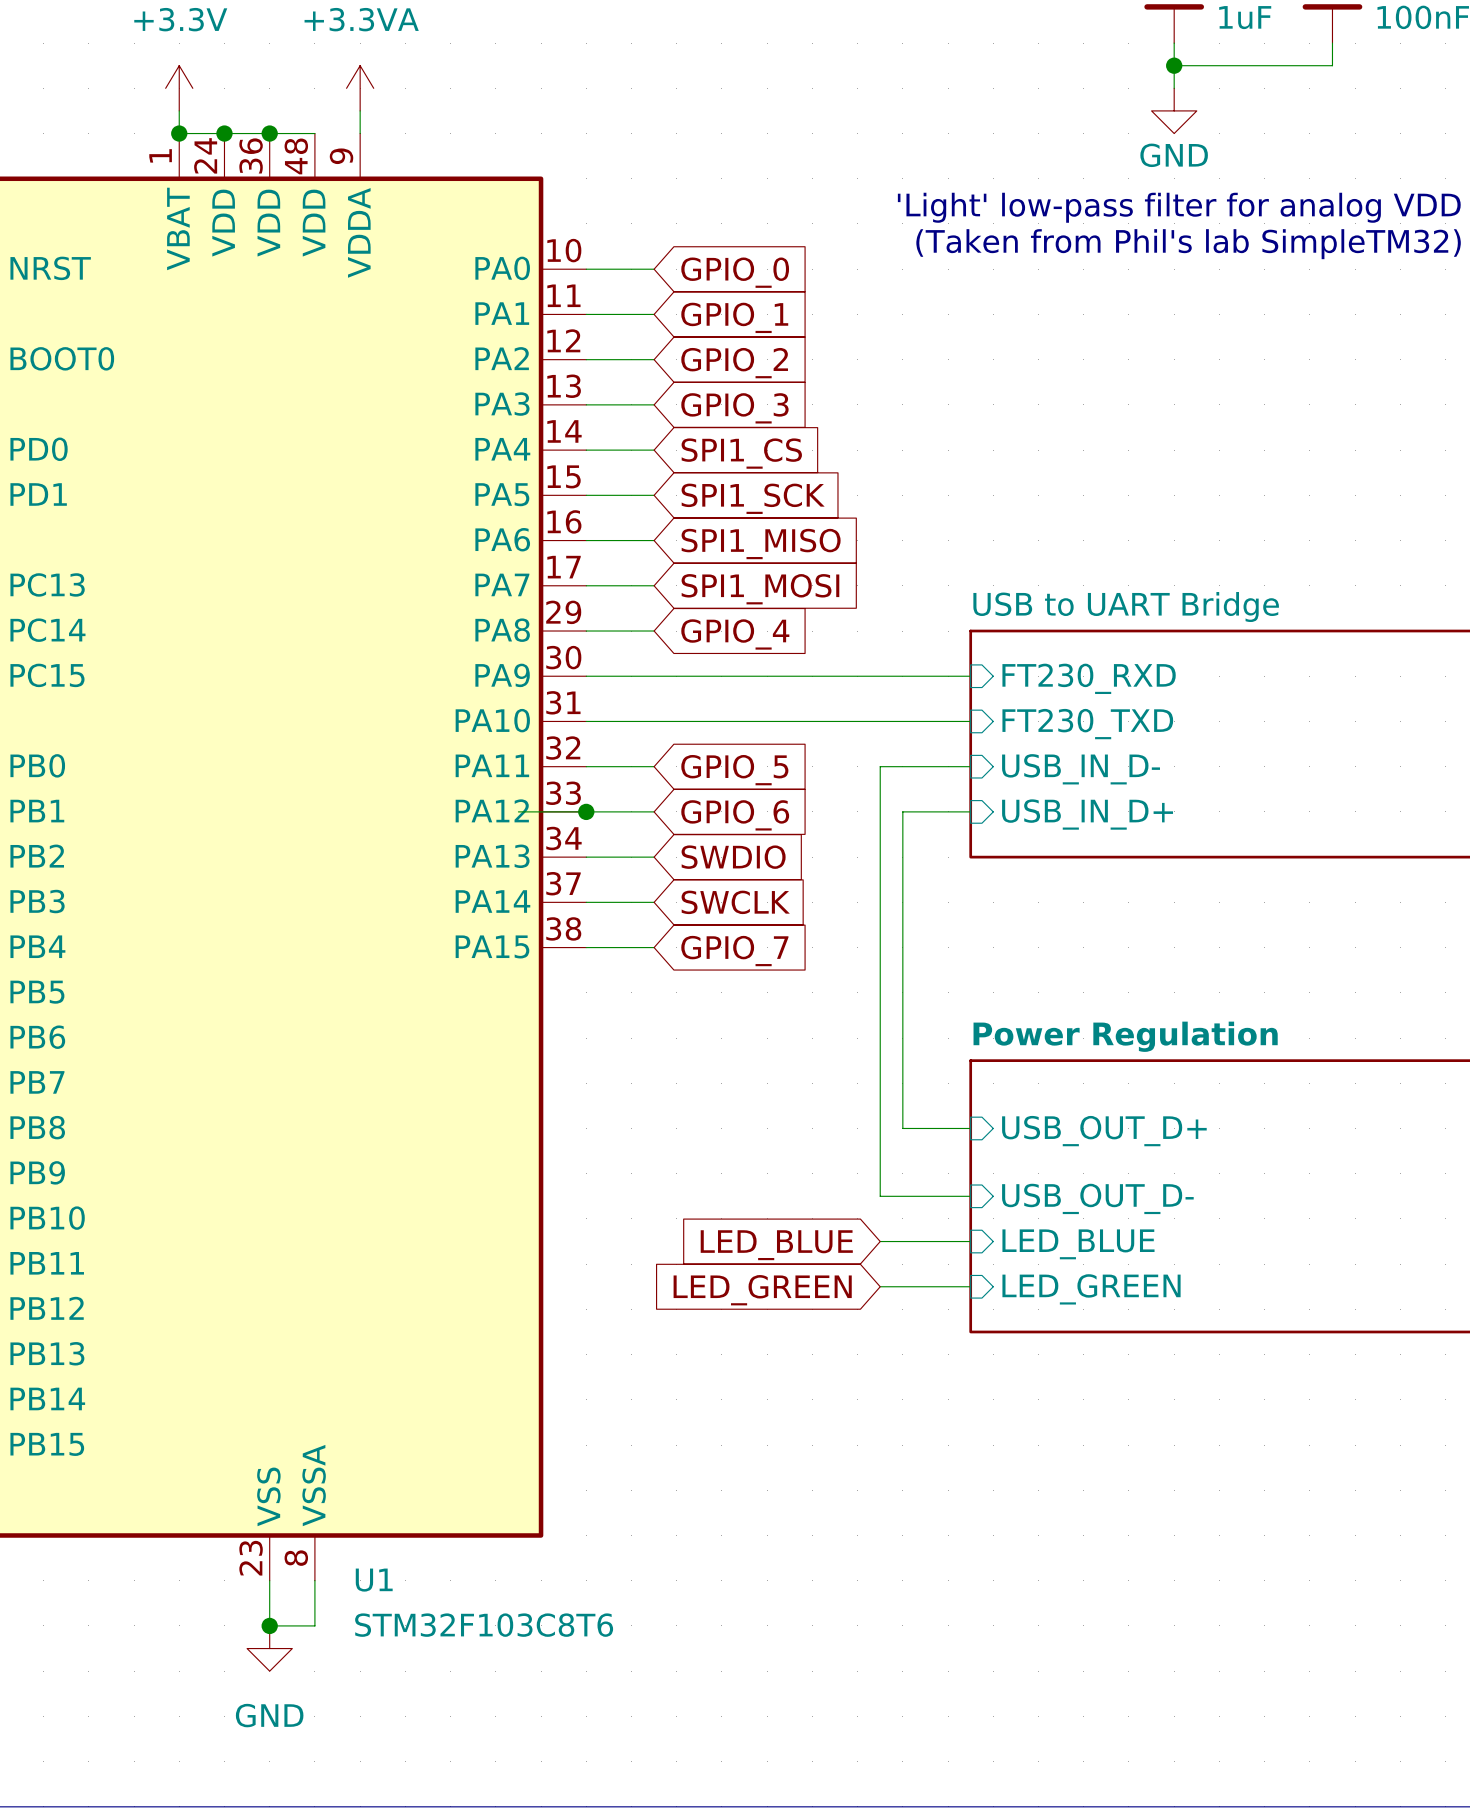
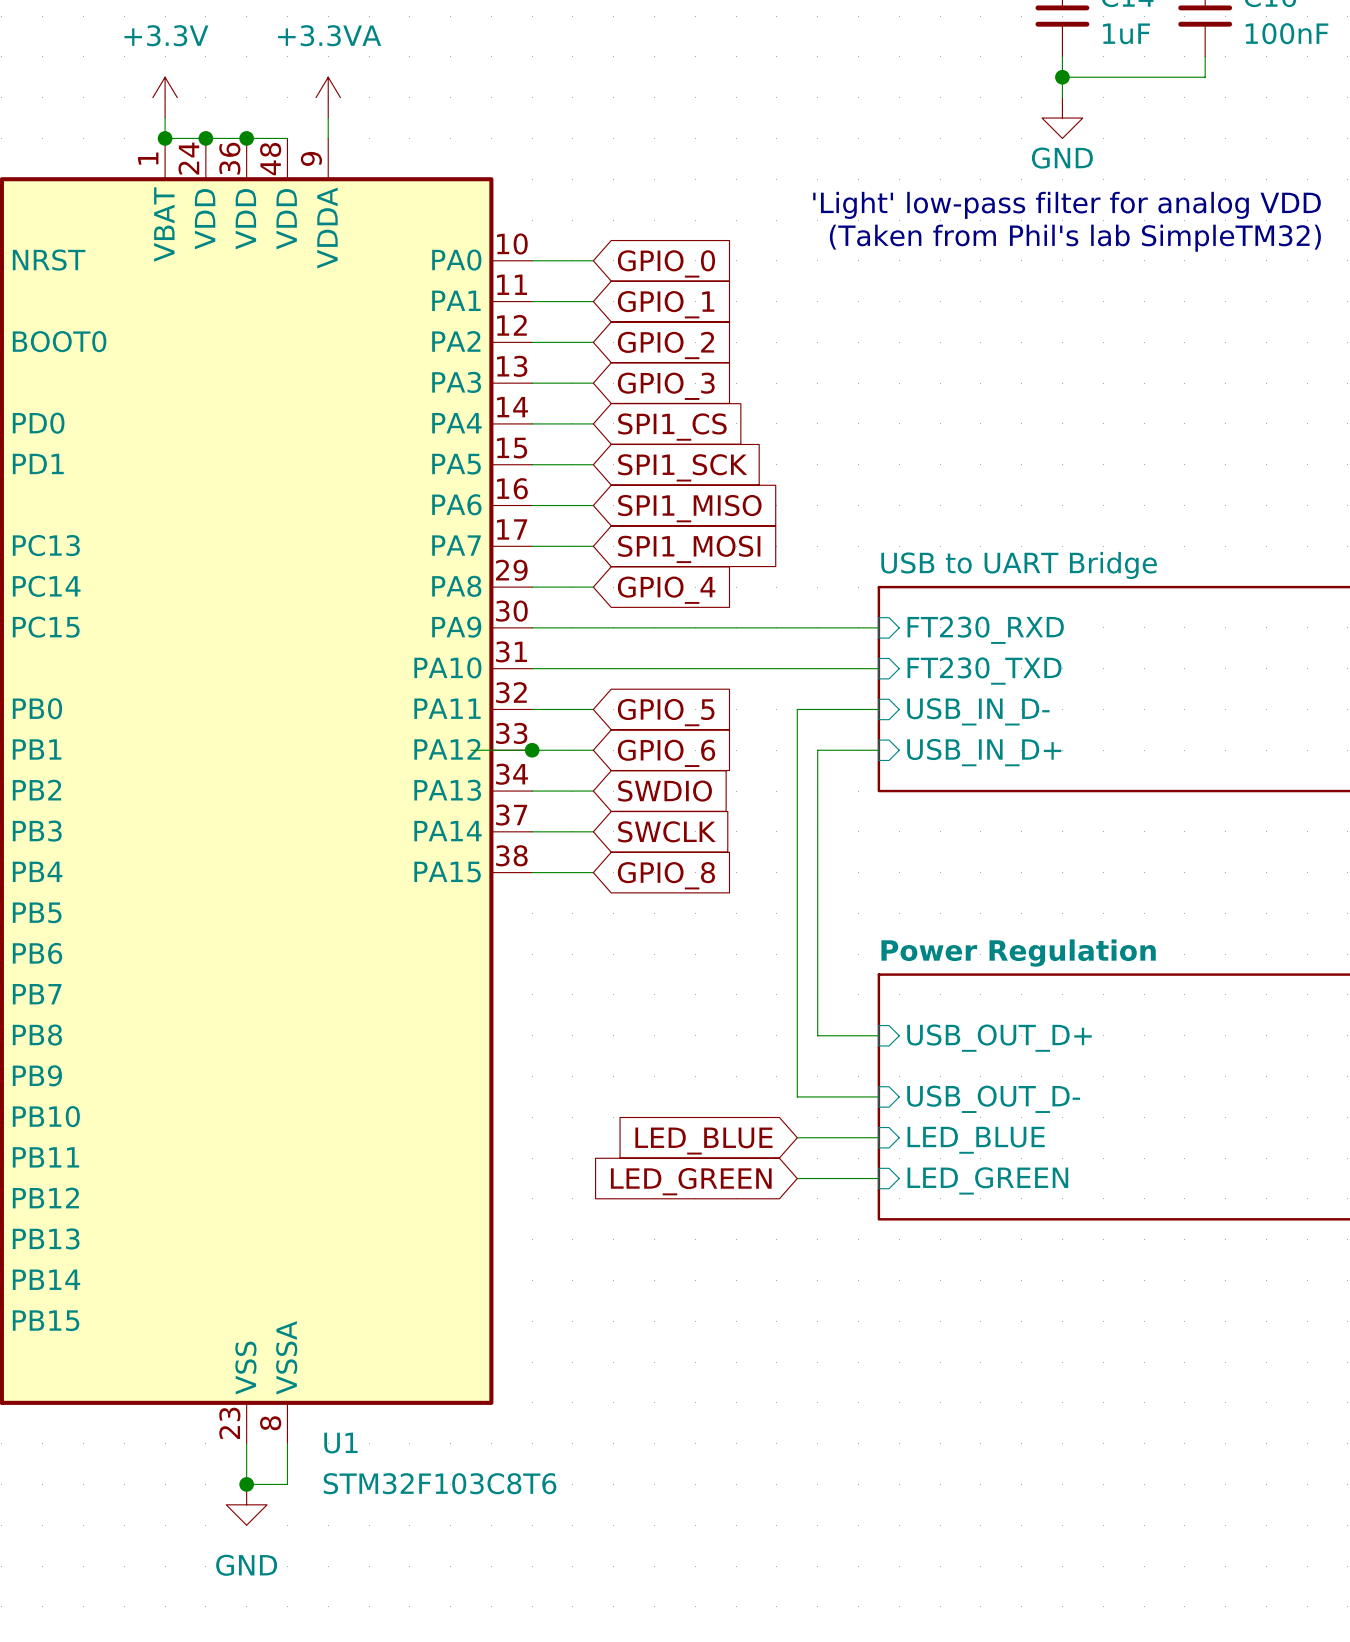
global label: GPIO_7 (734, 951) -> GPIO_8 (666, 875)

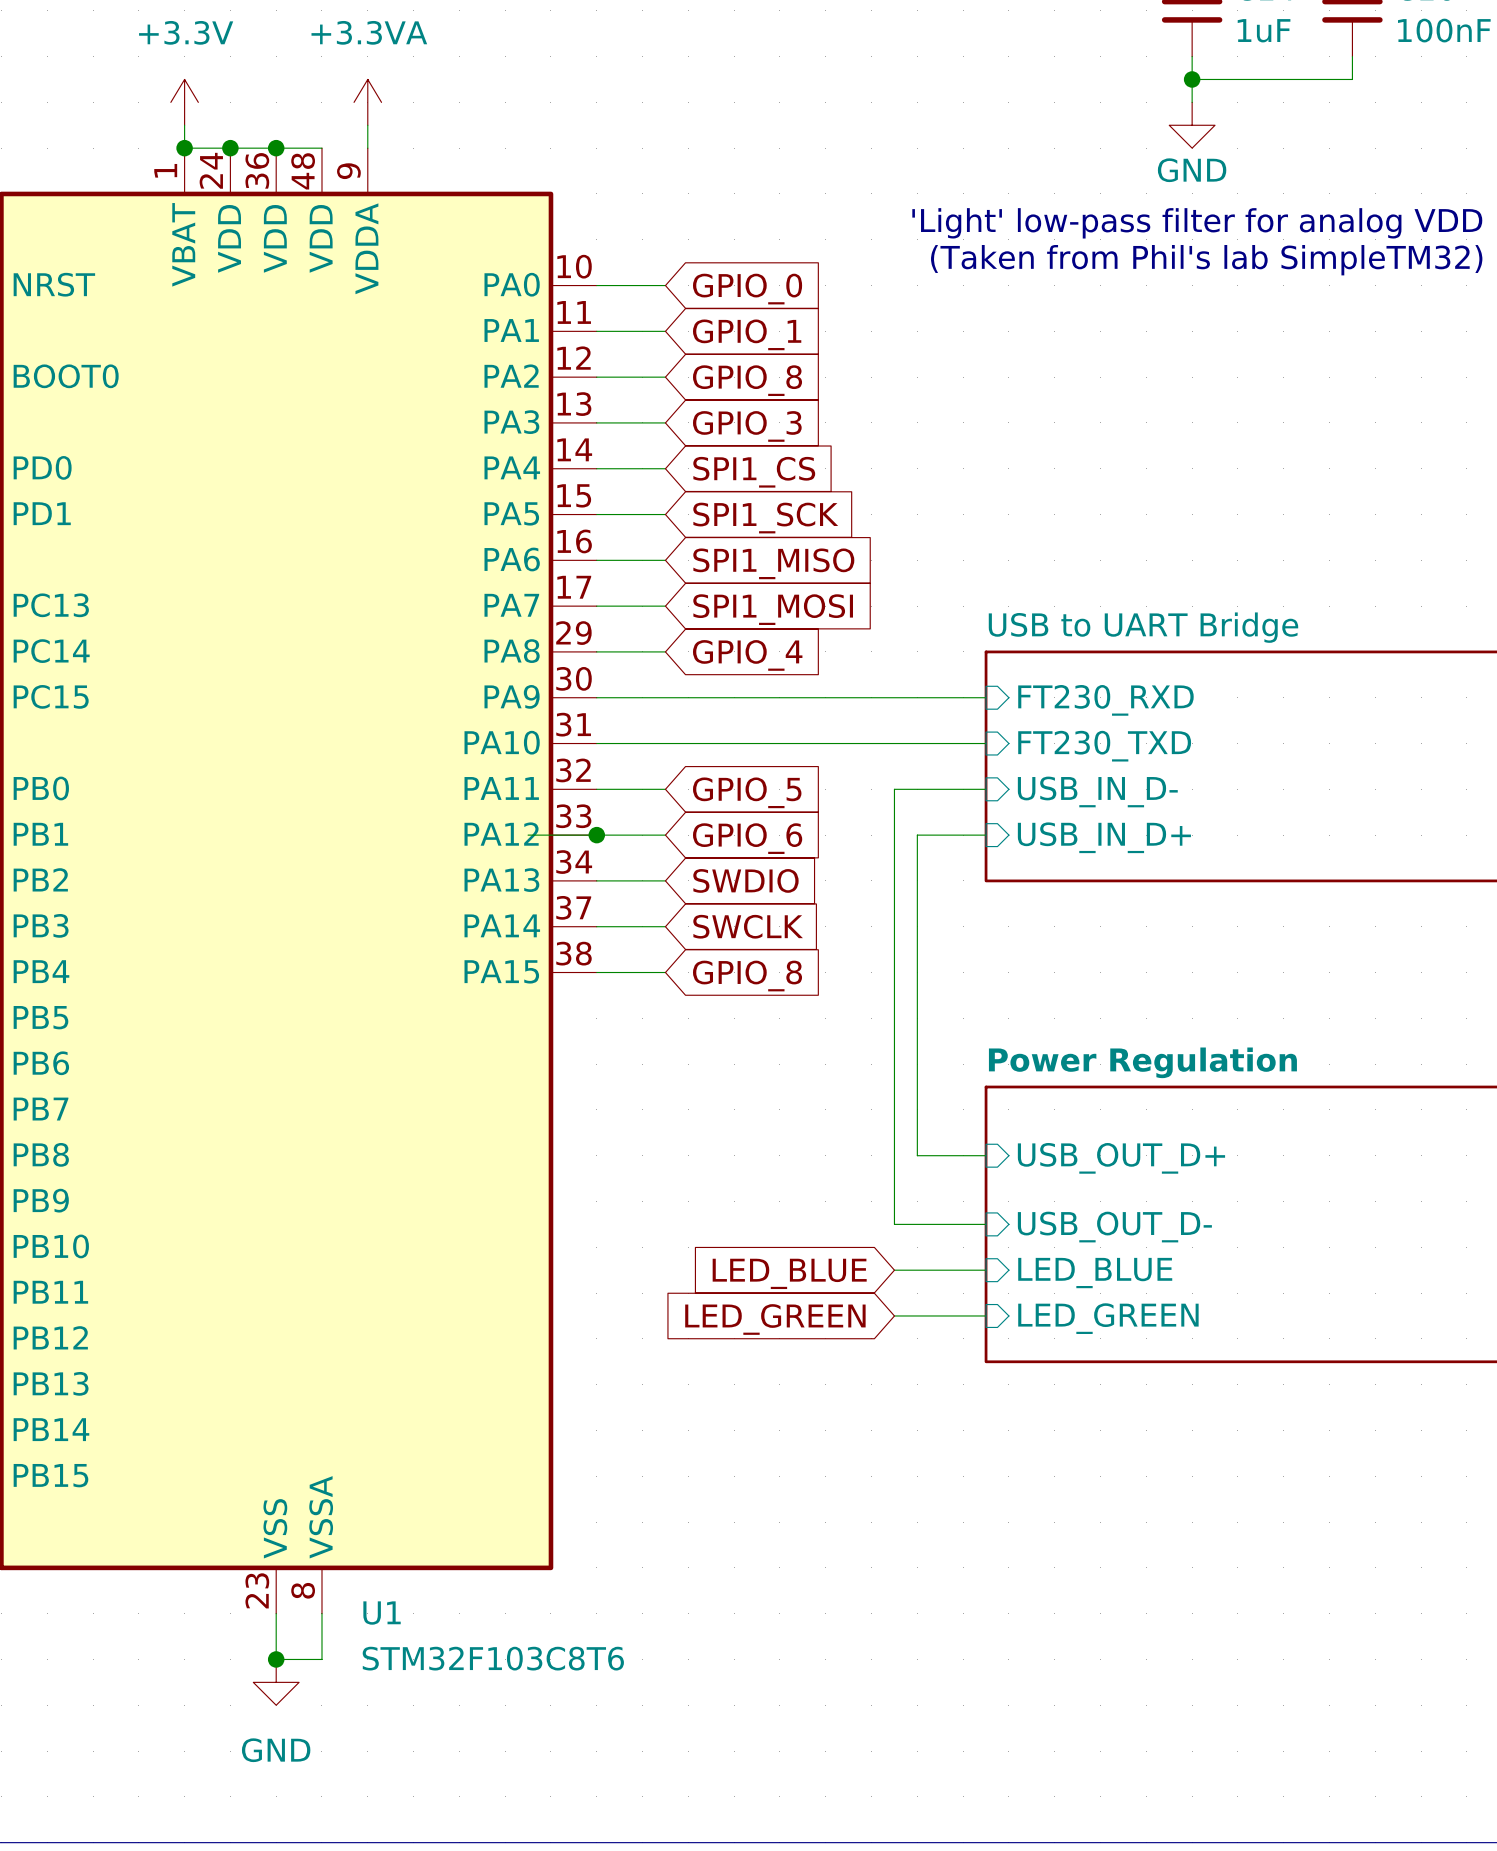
global label: GPIO_2 (665, 345) -> GPIO_8 (747, 380)

